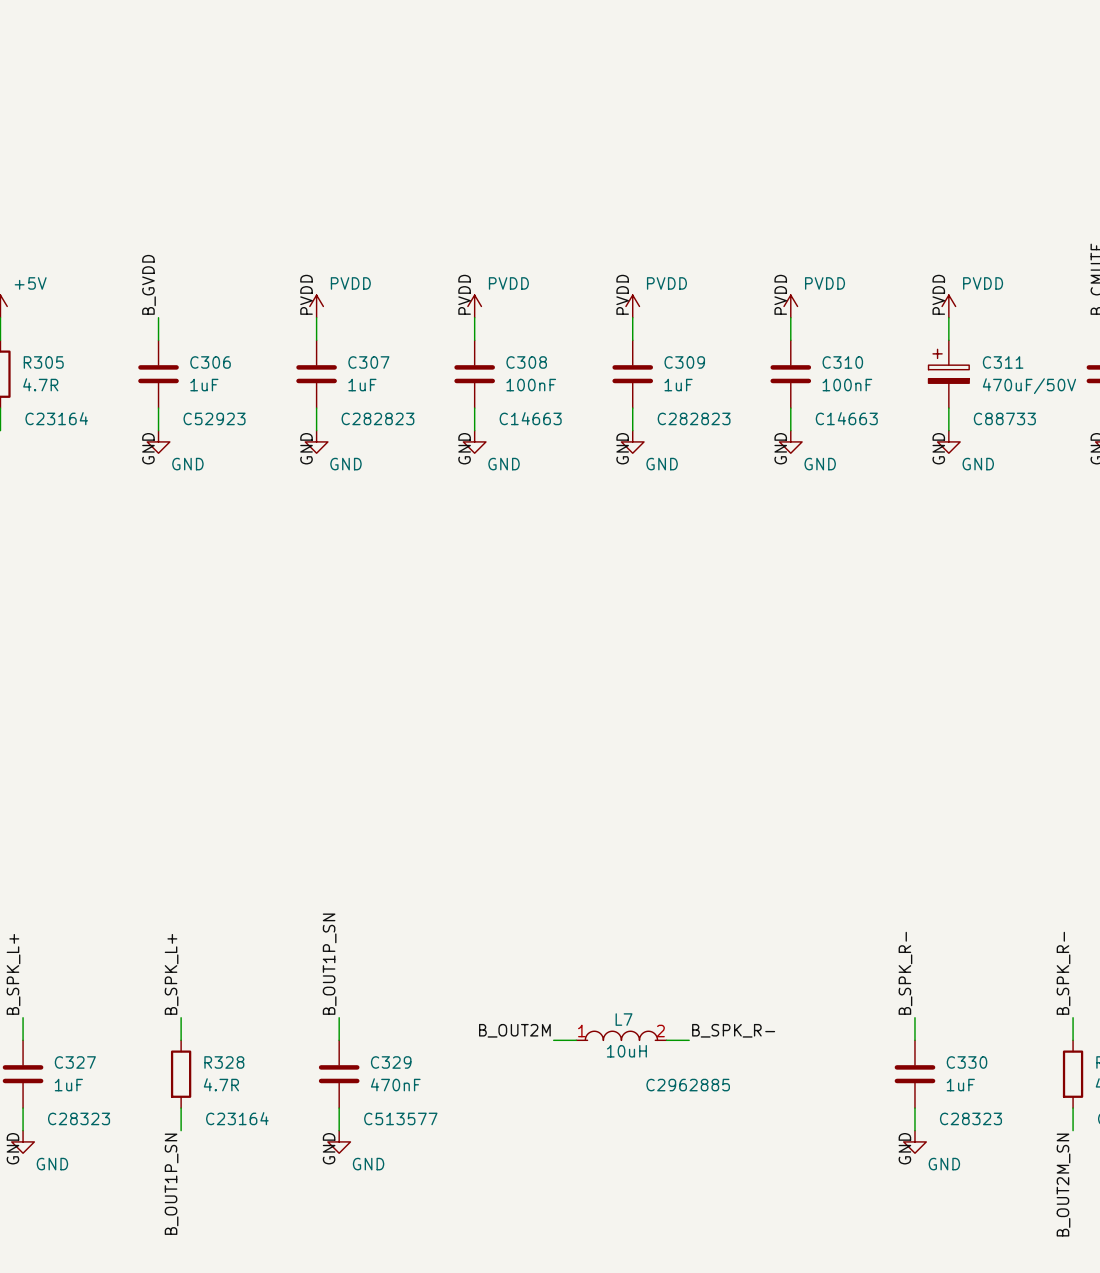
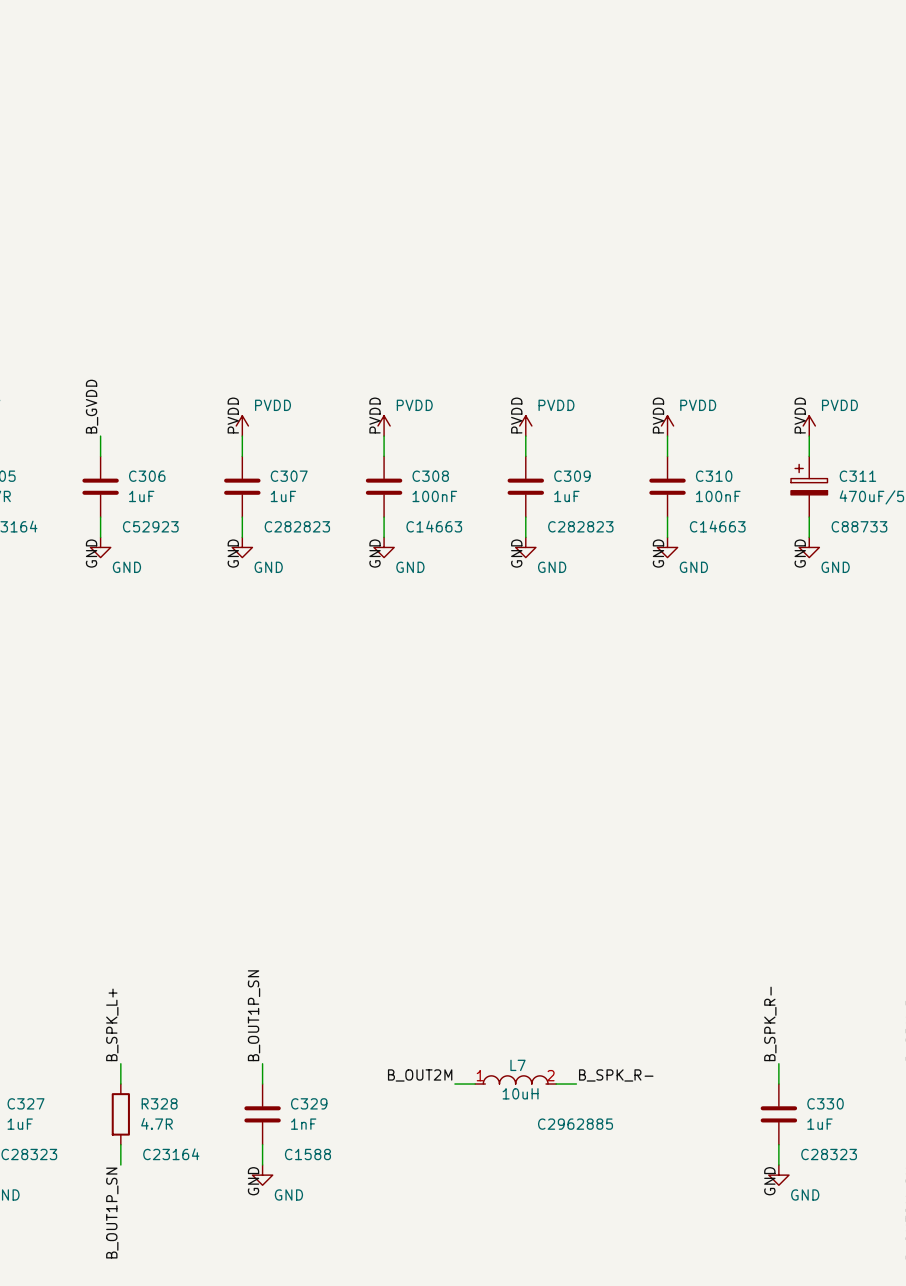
C329 value: 470nF (395, 1084) -> 1nF (303, 1124)
C329 text: C513577 (400, 1118) -> C1588 (307, 1154)

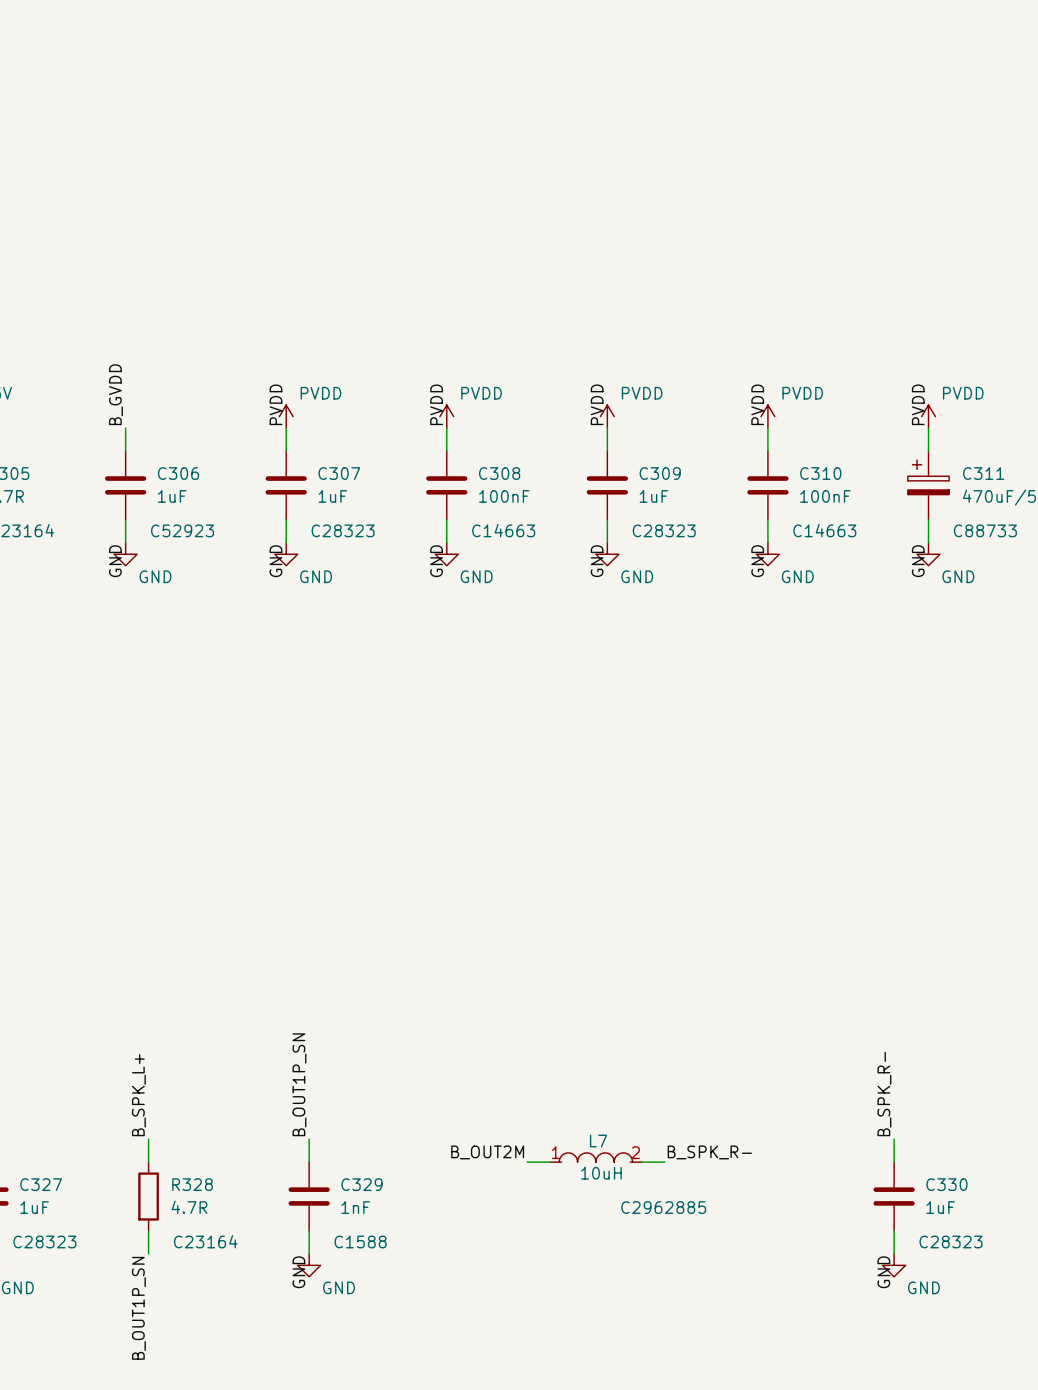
C307 text: C282823 (297, 526) -> C28323 (343, 530)
C309 text: C282823 (580, 526) -> C28323 (664, 530)

